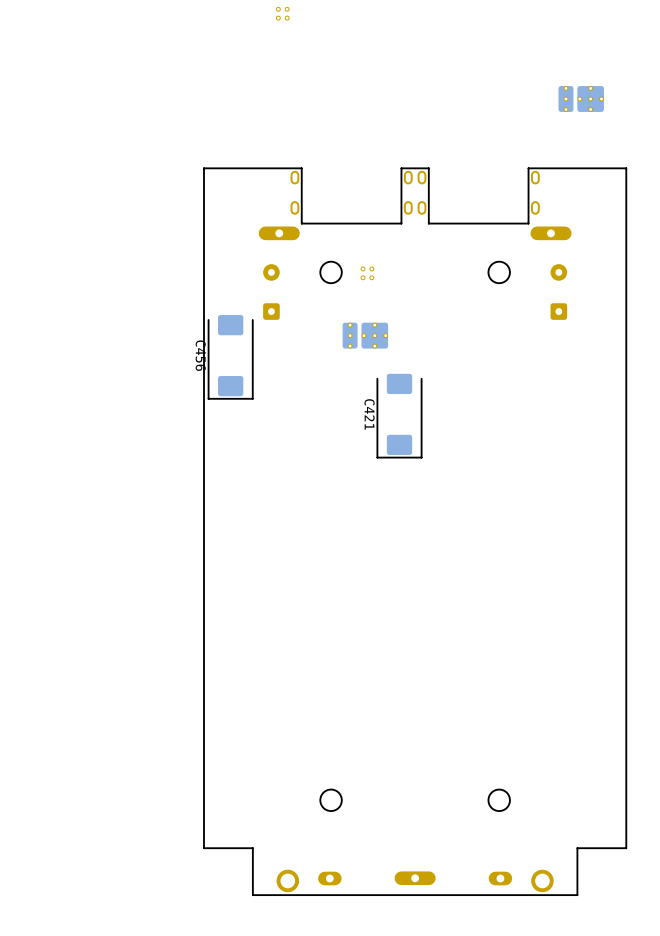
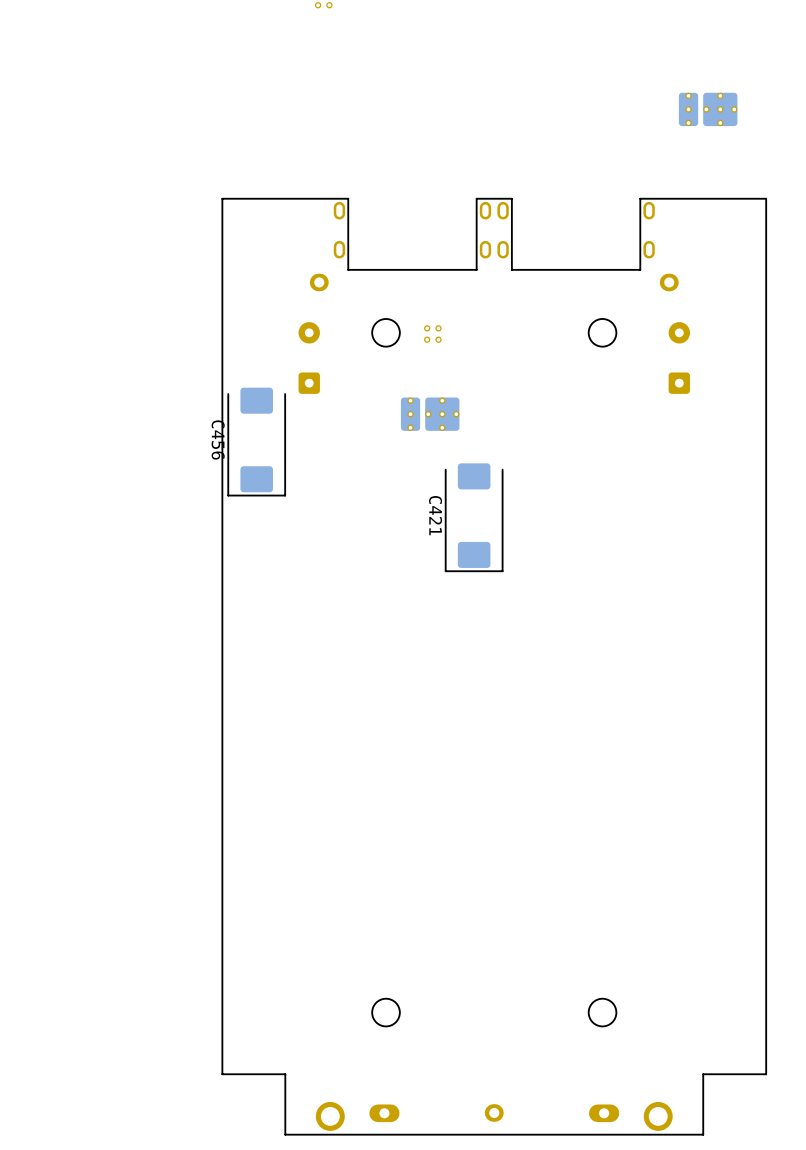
part footprint: [258, 226, 300, 241] -> [309, 273, 329, 292]
part footprint: [530, 226, 572, 241] -> [659, 273, 679, 292]
part footprint: [394, 871, 436, 886] -> [484, 1104, 504, 1122]

